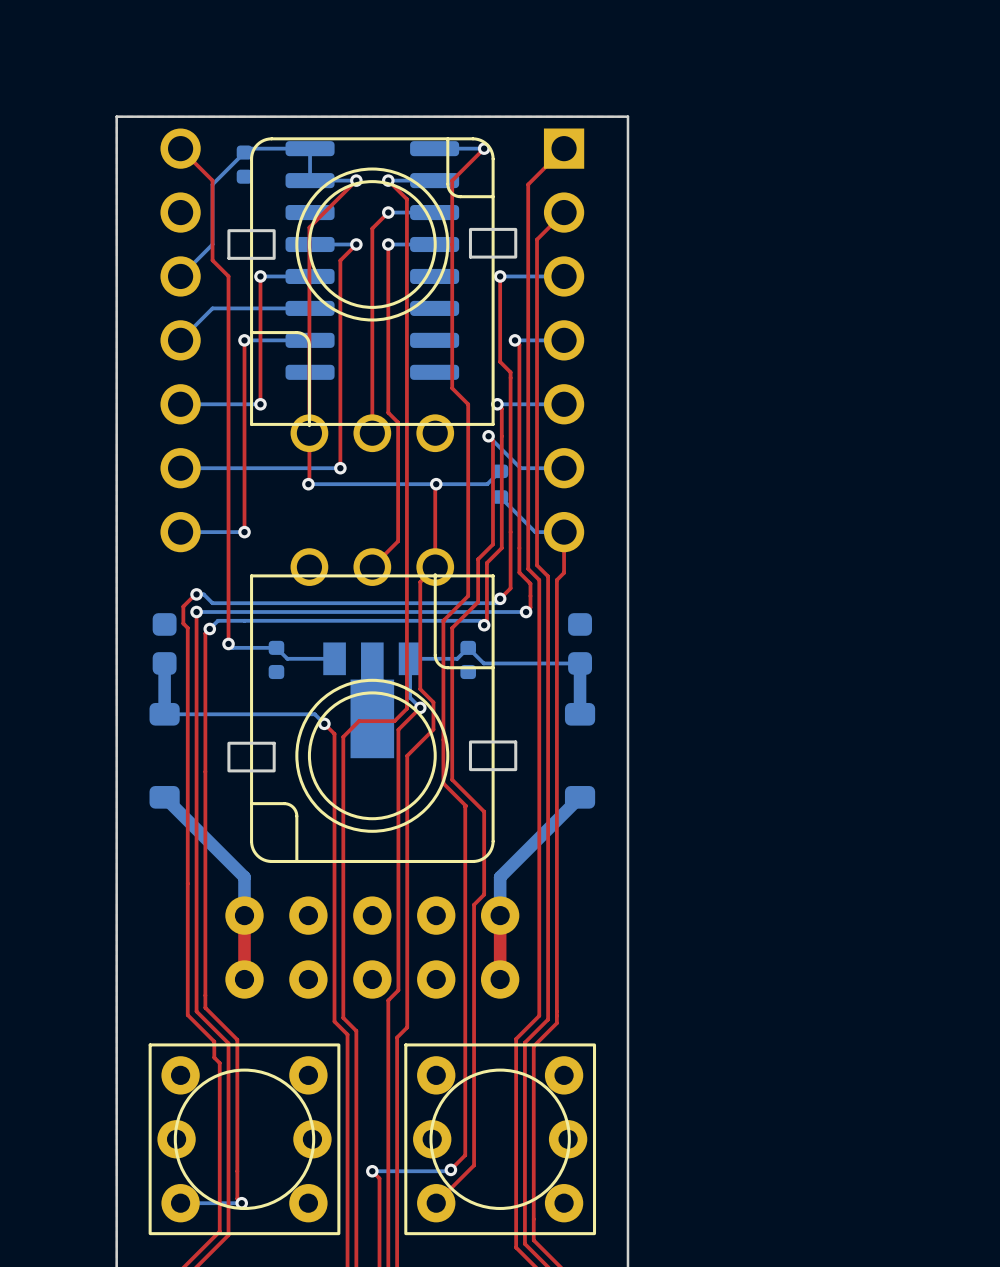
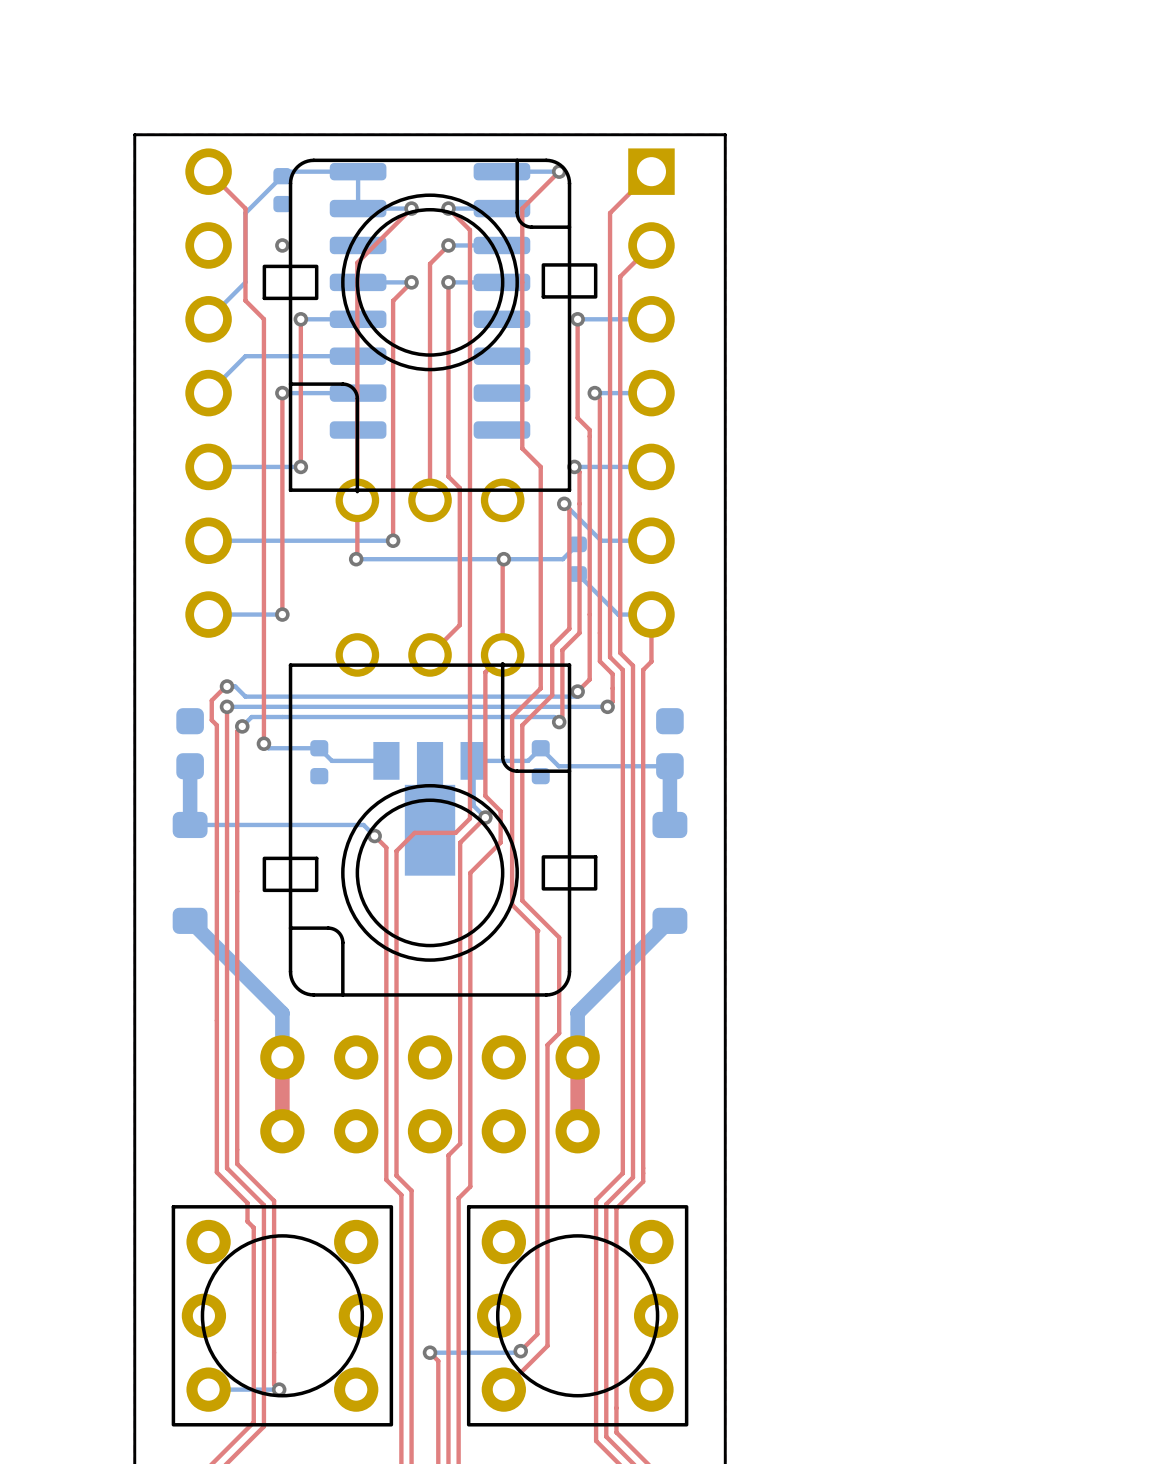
via: none -> (282, 245)

